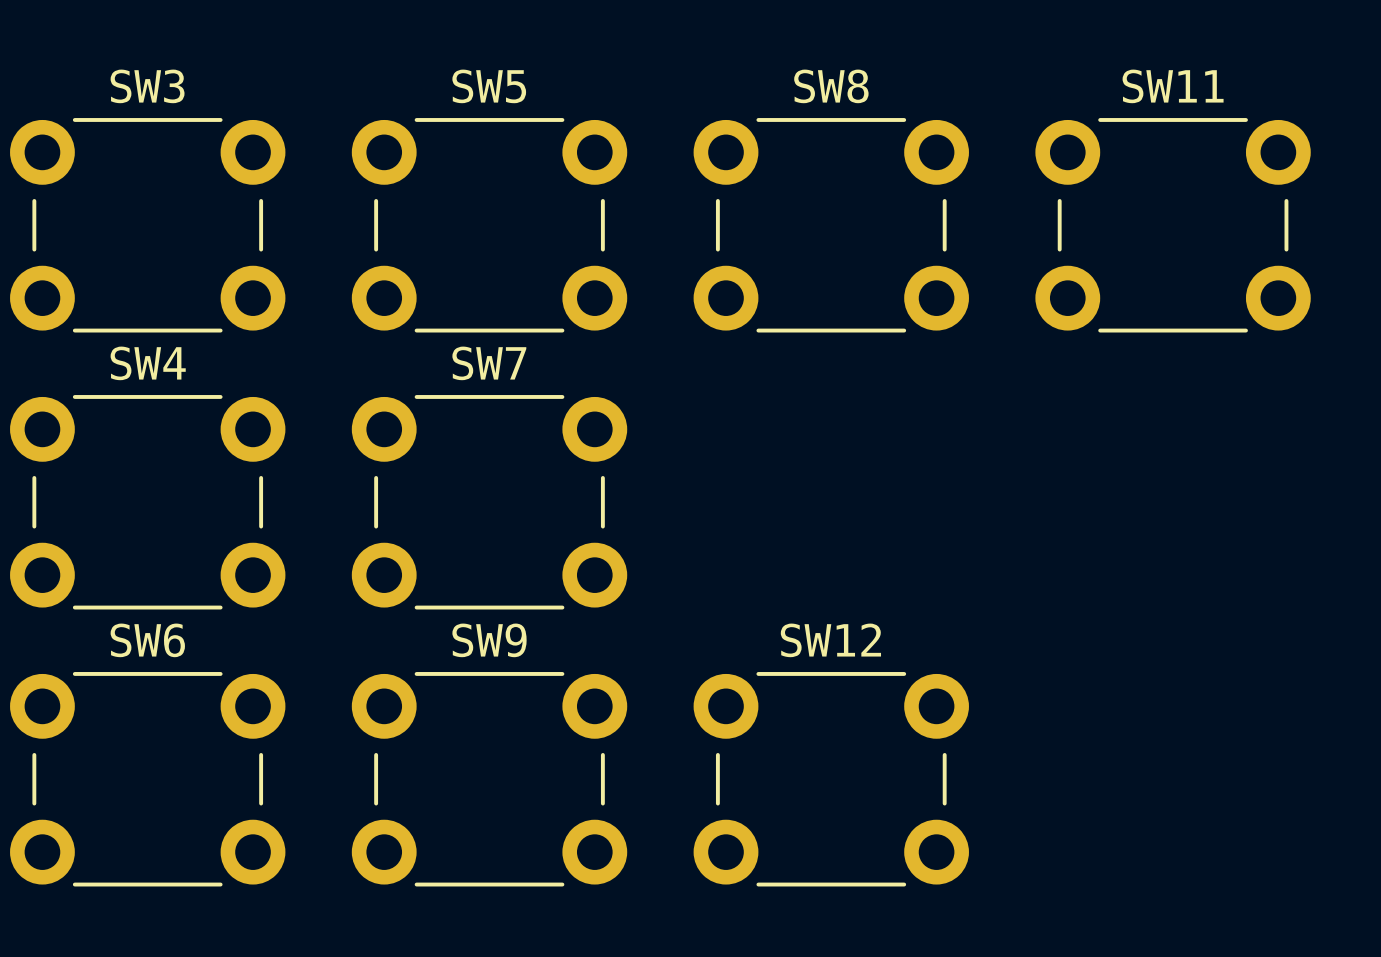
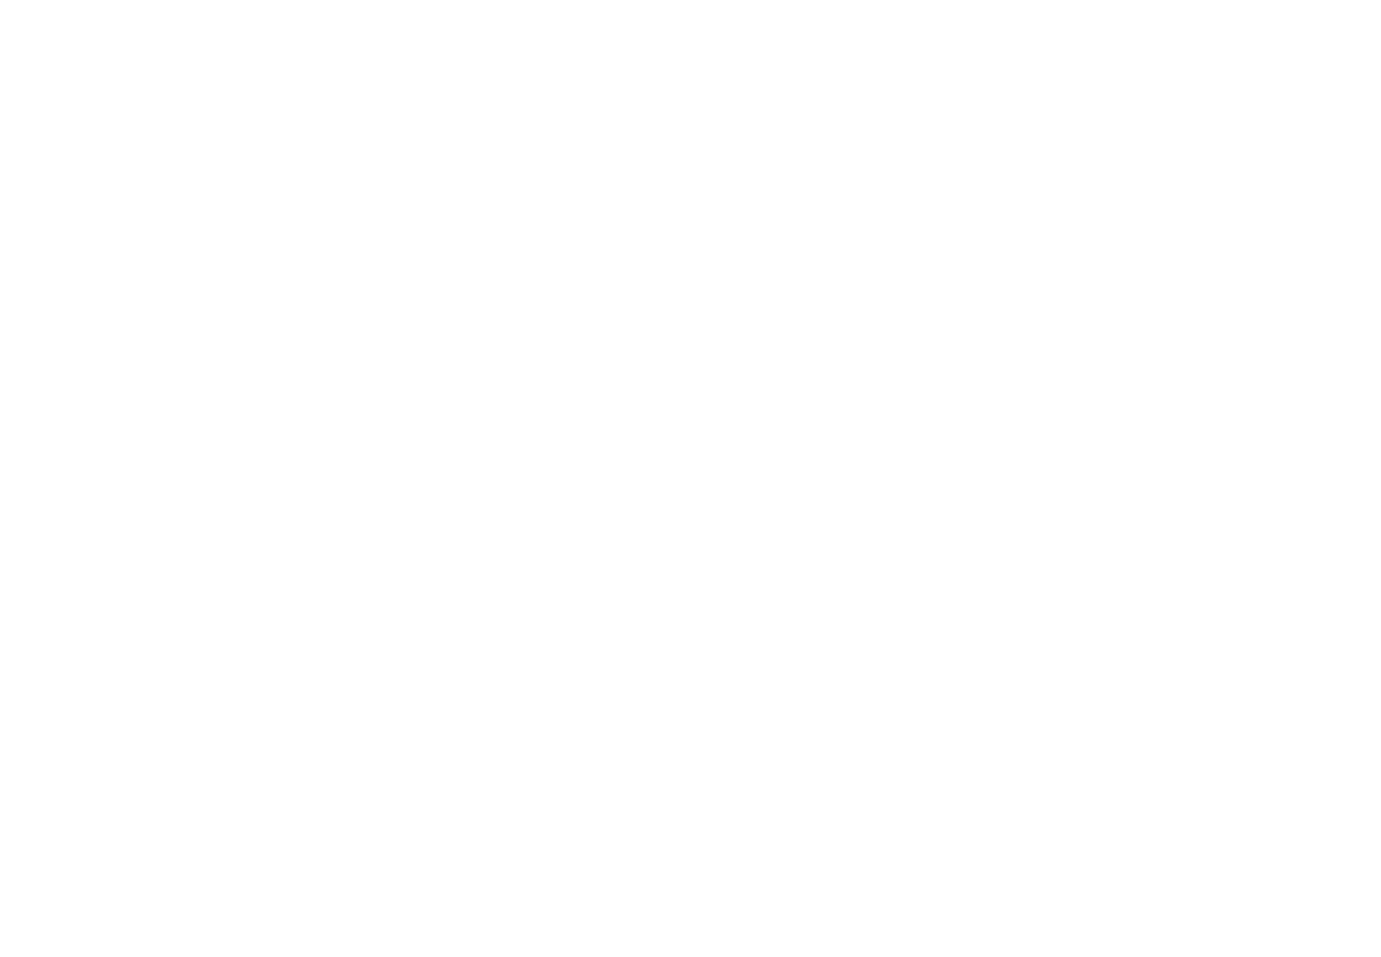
SW3: (147, 225) -> none
SW5: (489, 225) -> none
SW8: (831, 225) -> none
SW11: (1173, 225) -> none
SW4: (147, 502) -> none
SW7: (489, 502) -> none
SW6: (147, 779) -> none
SW9: (489, 779) -> none
SW12: (831, 779) -> none

